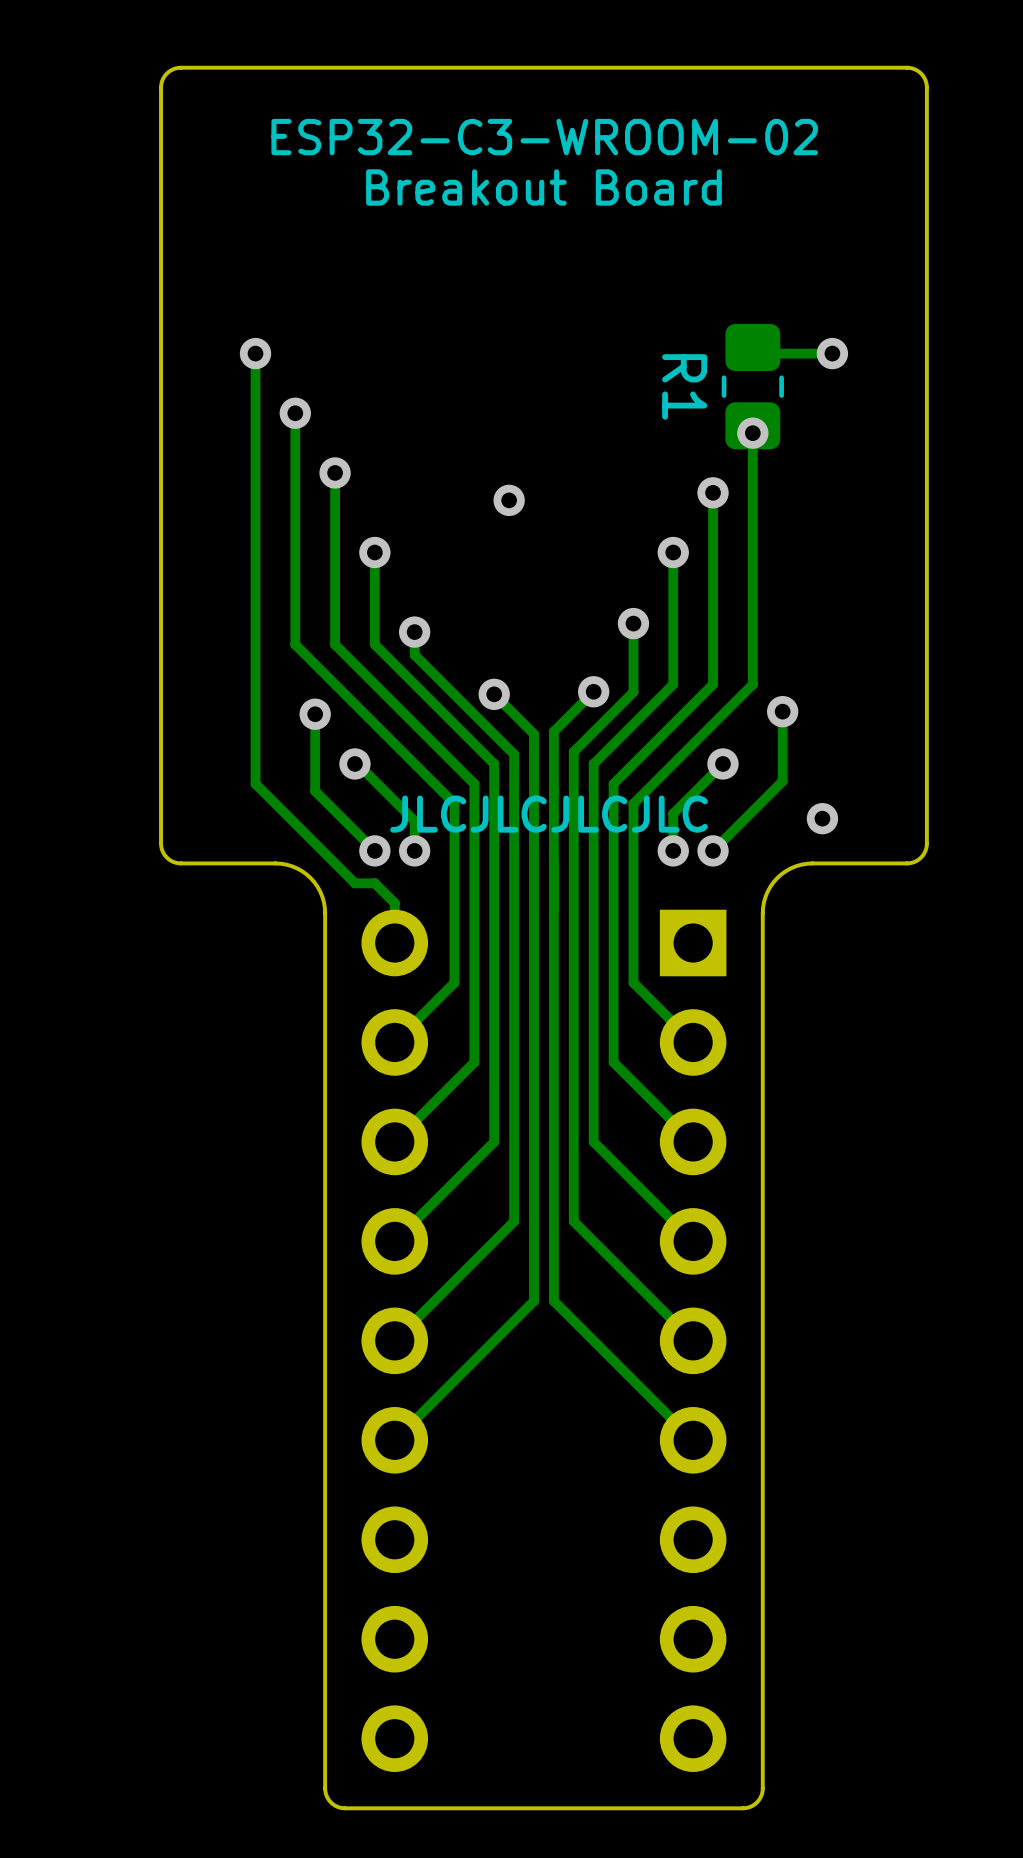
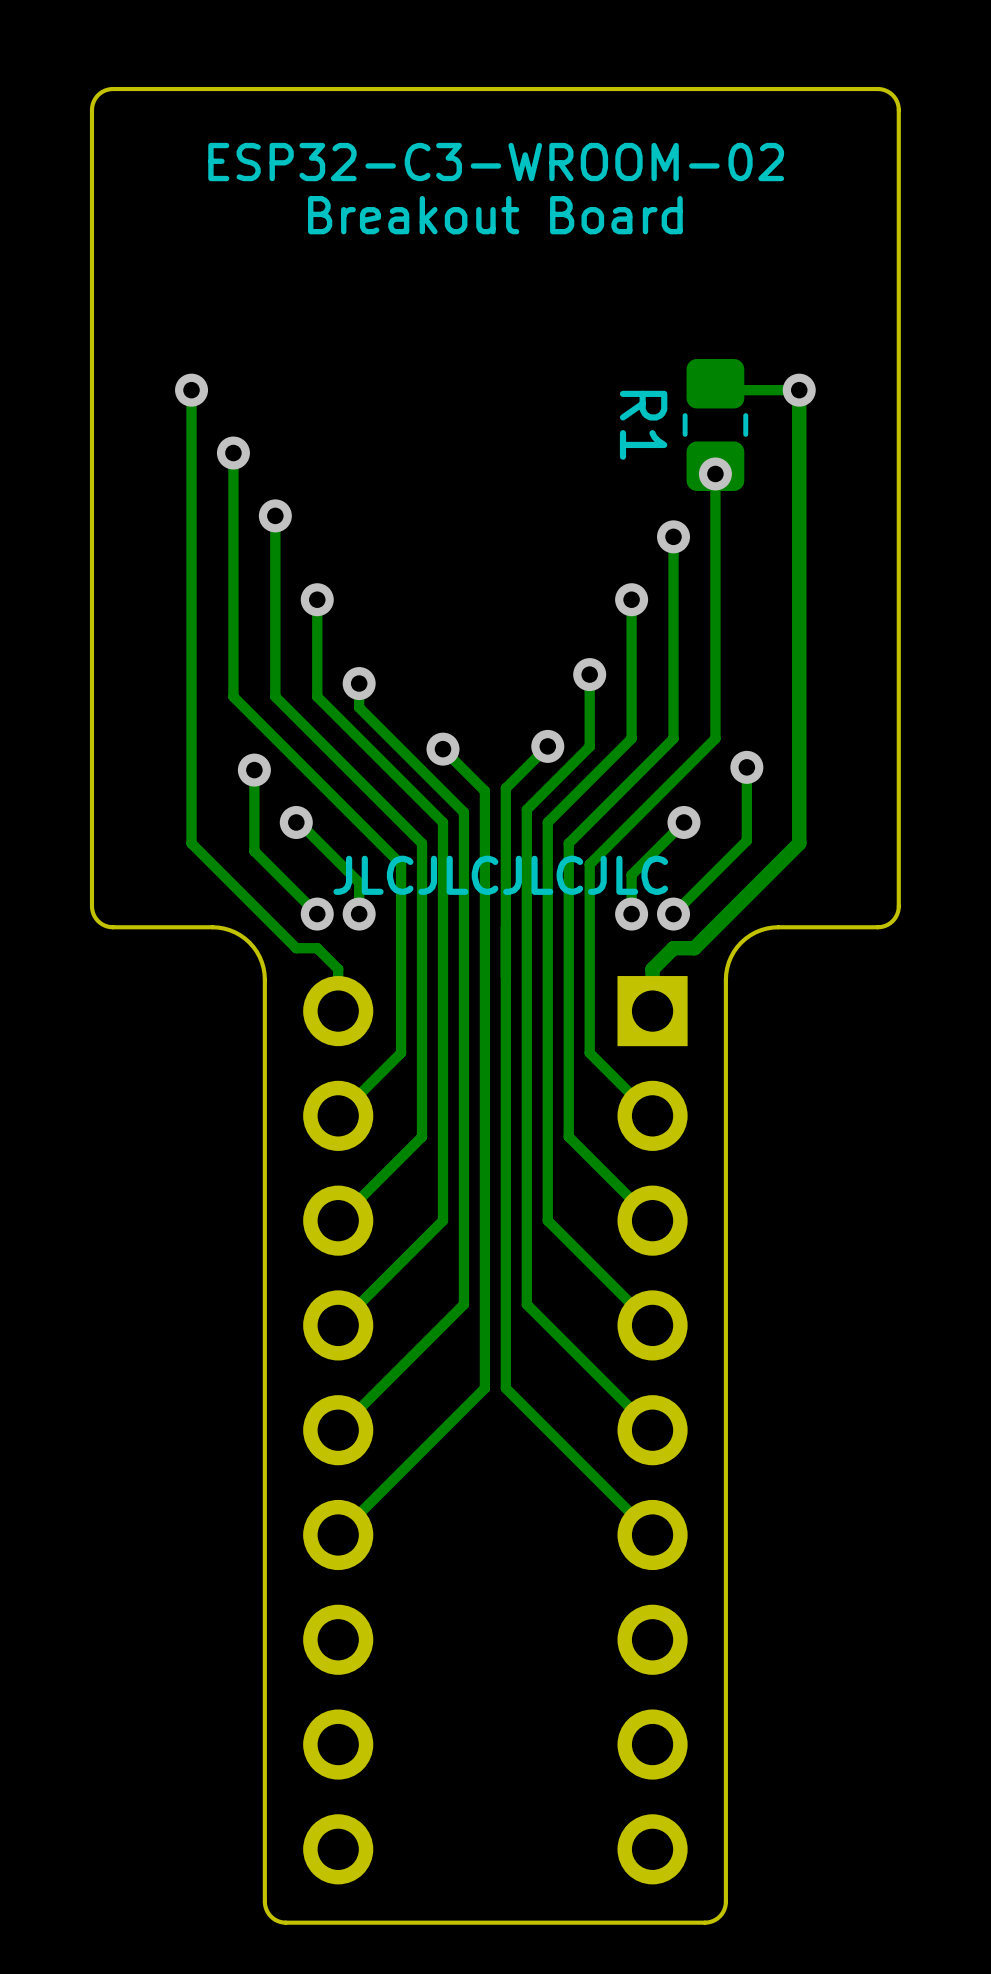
track: none -> (799, 390) (799, 843) (694, 948) (673, 948) (652, 969) (652, 1011)
via: (509, 500) -> none
via: (822, 818) -> none

